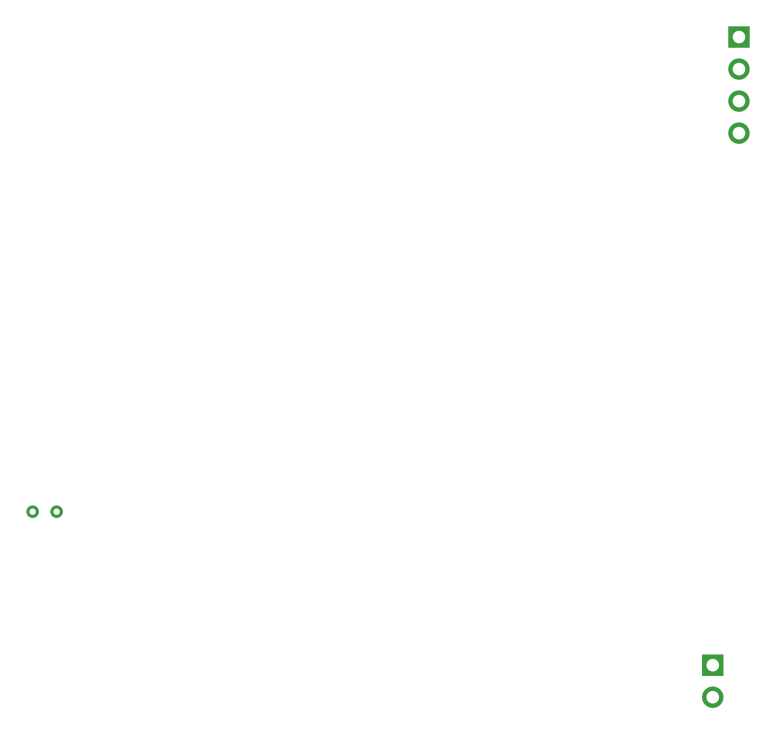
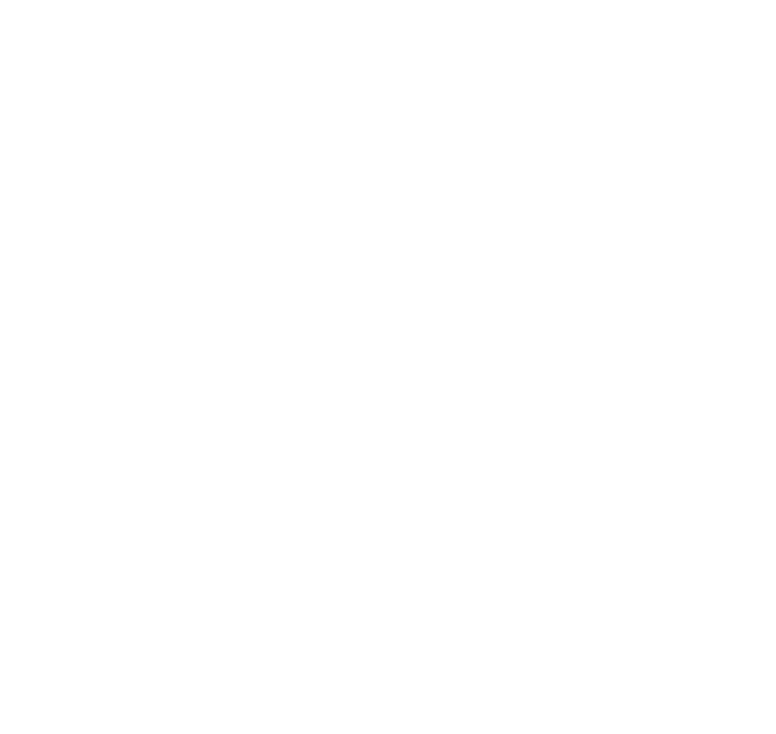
part: (738, 85) -> none
part: (44, 511) -> none
part: (712, 681) -> none

